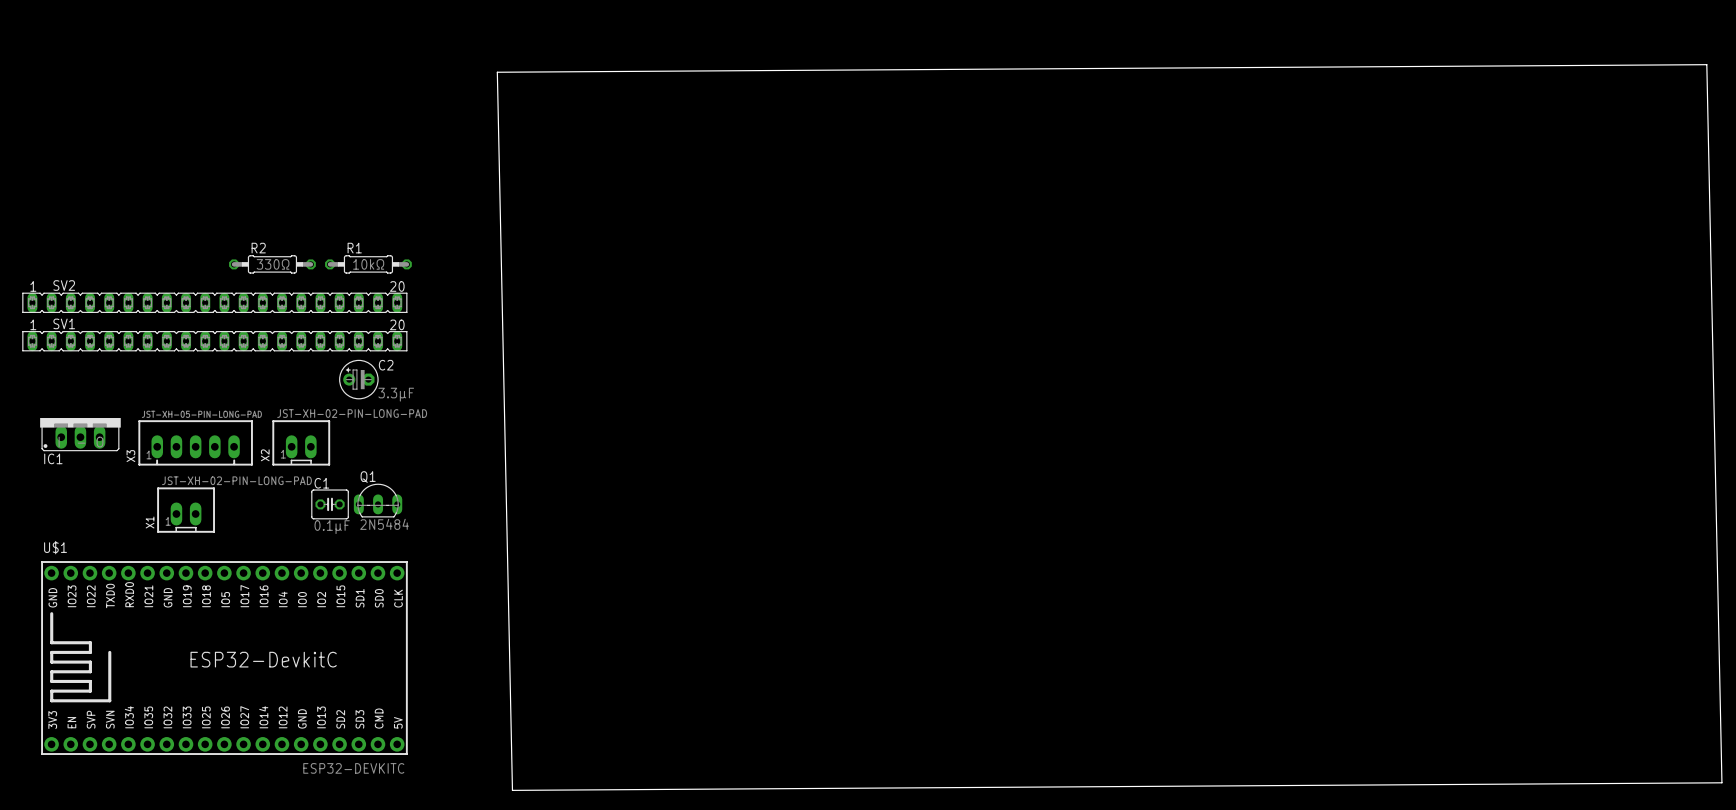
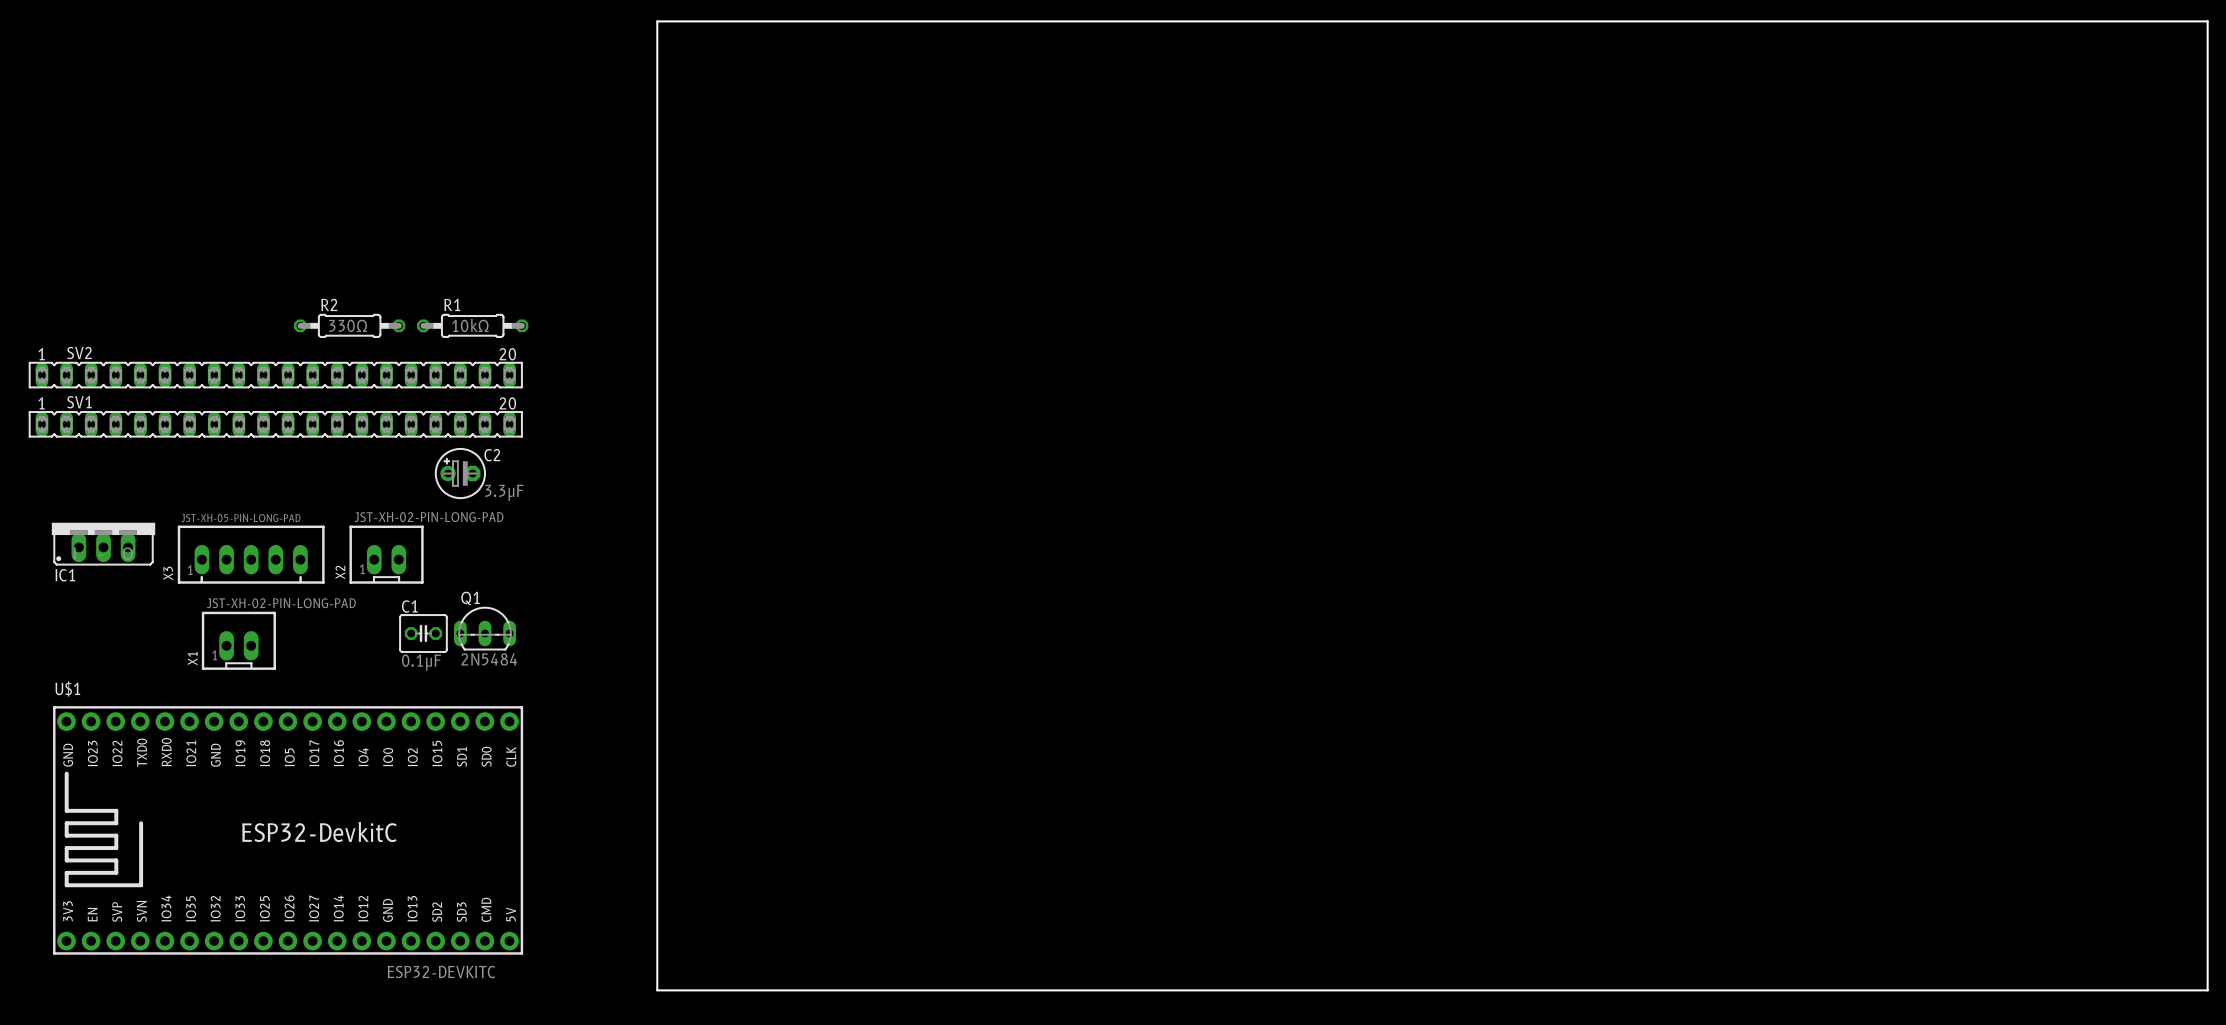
board edge: (1706, 64) (1721, 782) (512, 790) (497, 72) (1706, 64) -> (657, 21) (657, 990) (2207, 990) (2207, 21) (657, 21)

